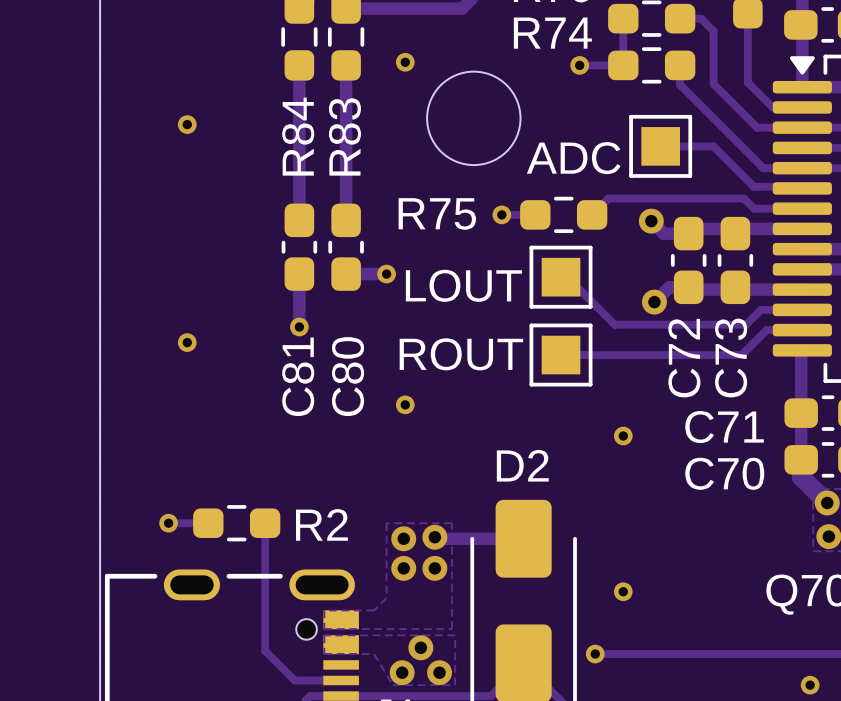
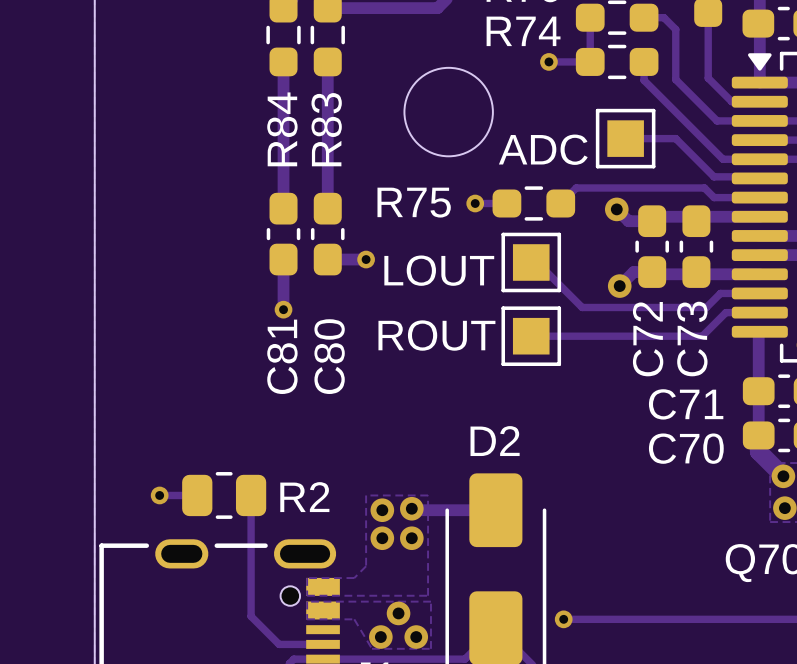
via: (405, 62) -> none
via: (187, 124) -> none
via: (187, 342) -> none
via: (405, 404) -> none
via: (623, 436) -> none
R2 footprint: [193, 505, 281, 542] -> [182, 472, 267, 519]
via: (623, 591) -> none
via: (810, 685) -> none

